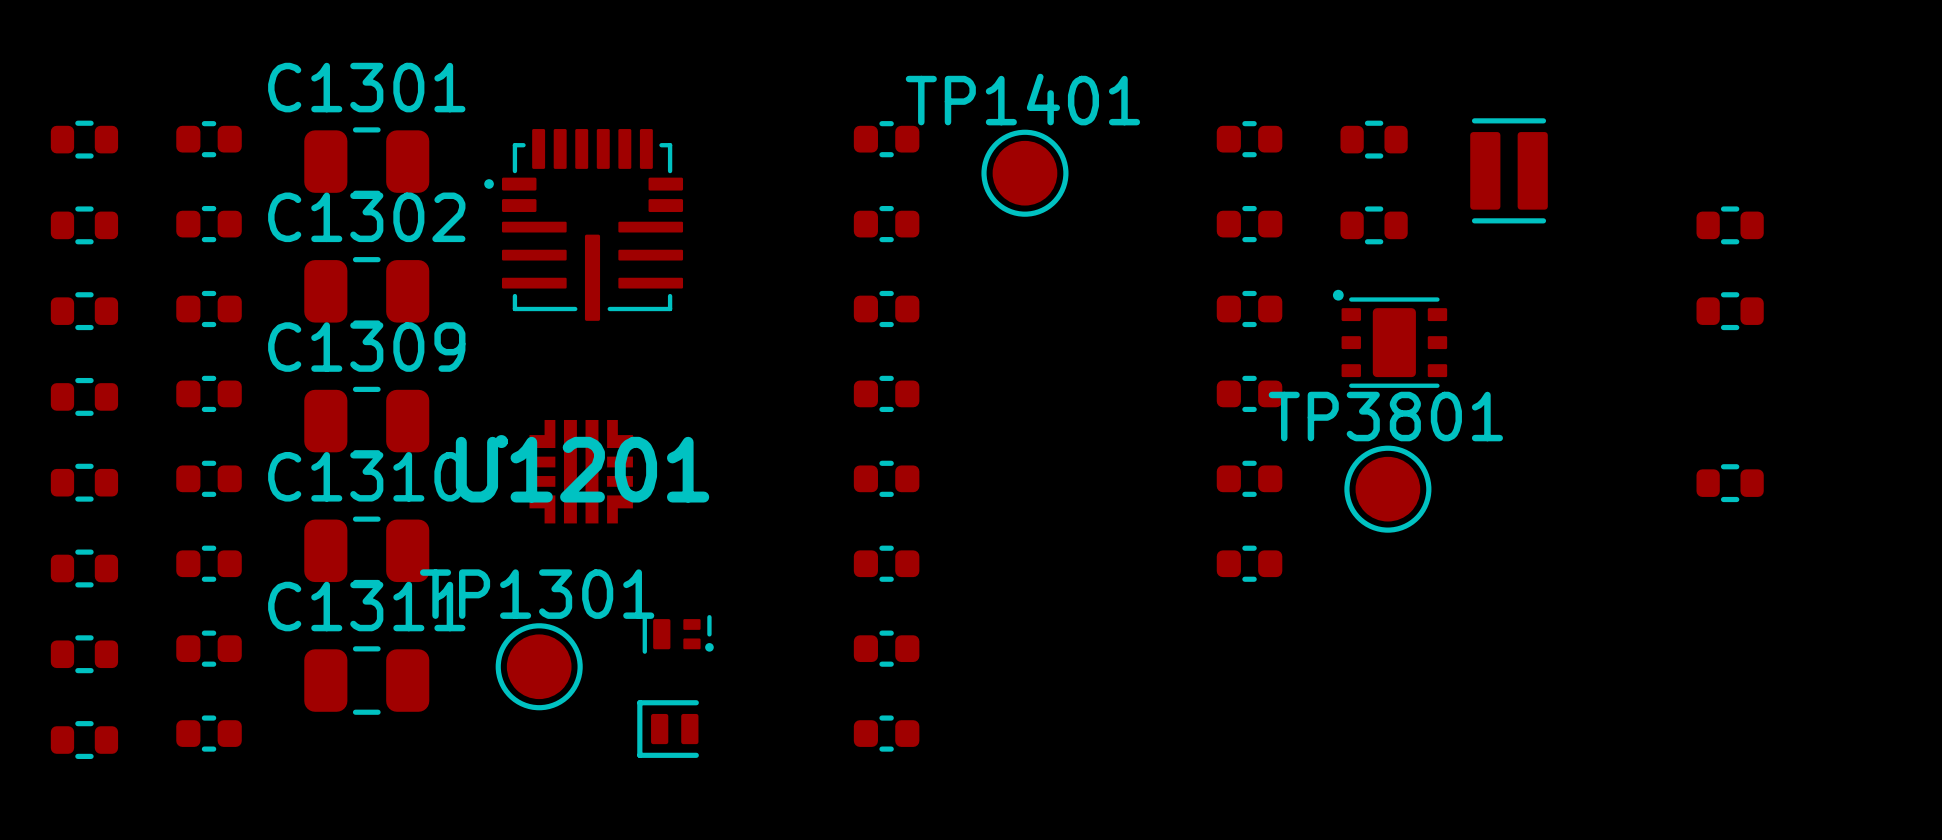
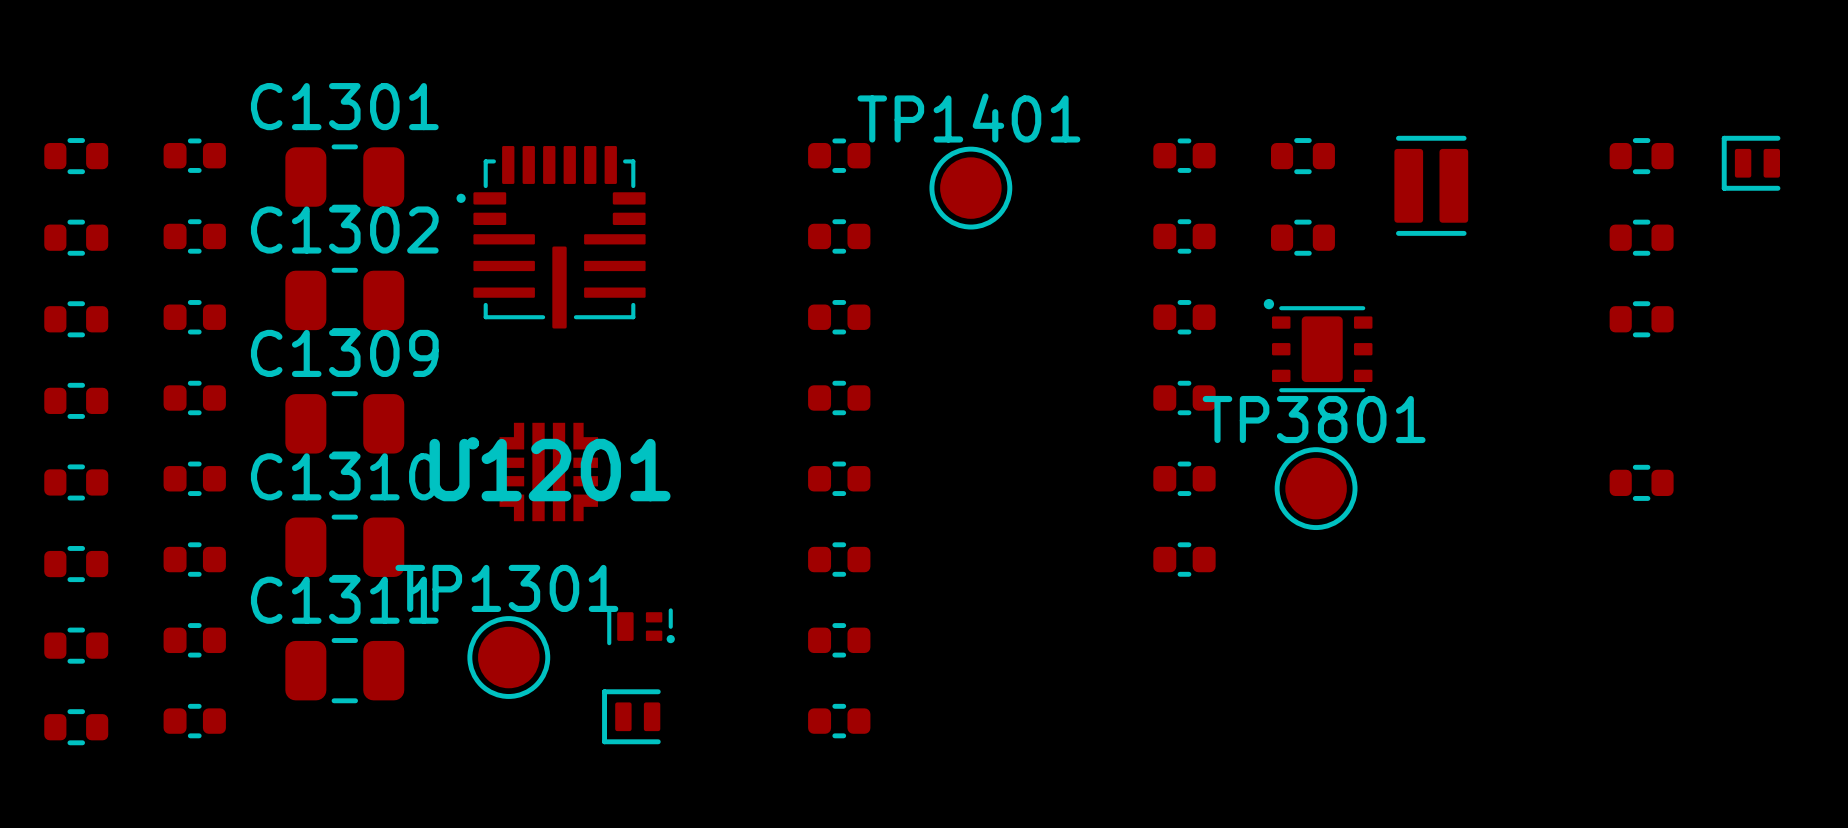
part: none -> (1641, 156)
part: none -> (1751, 163)

